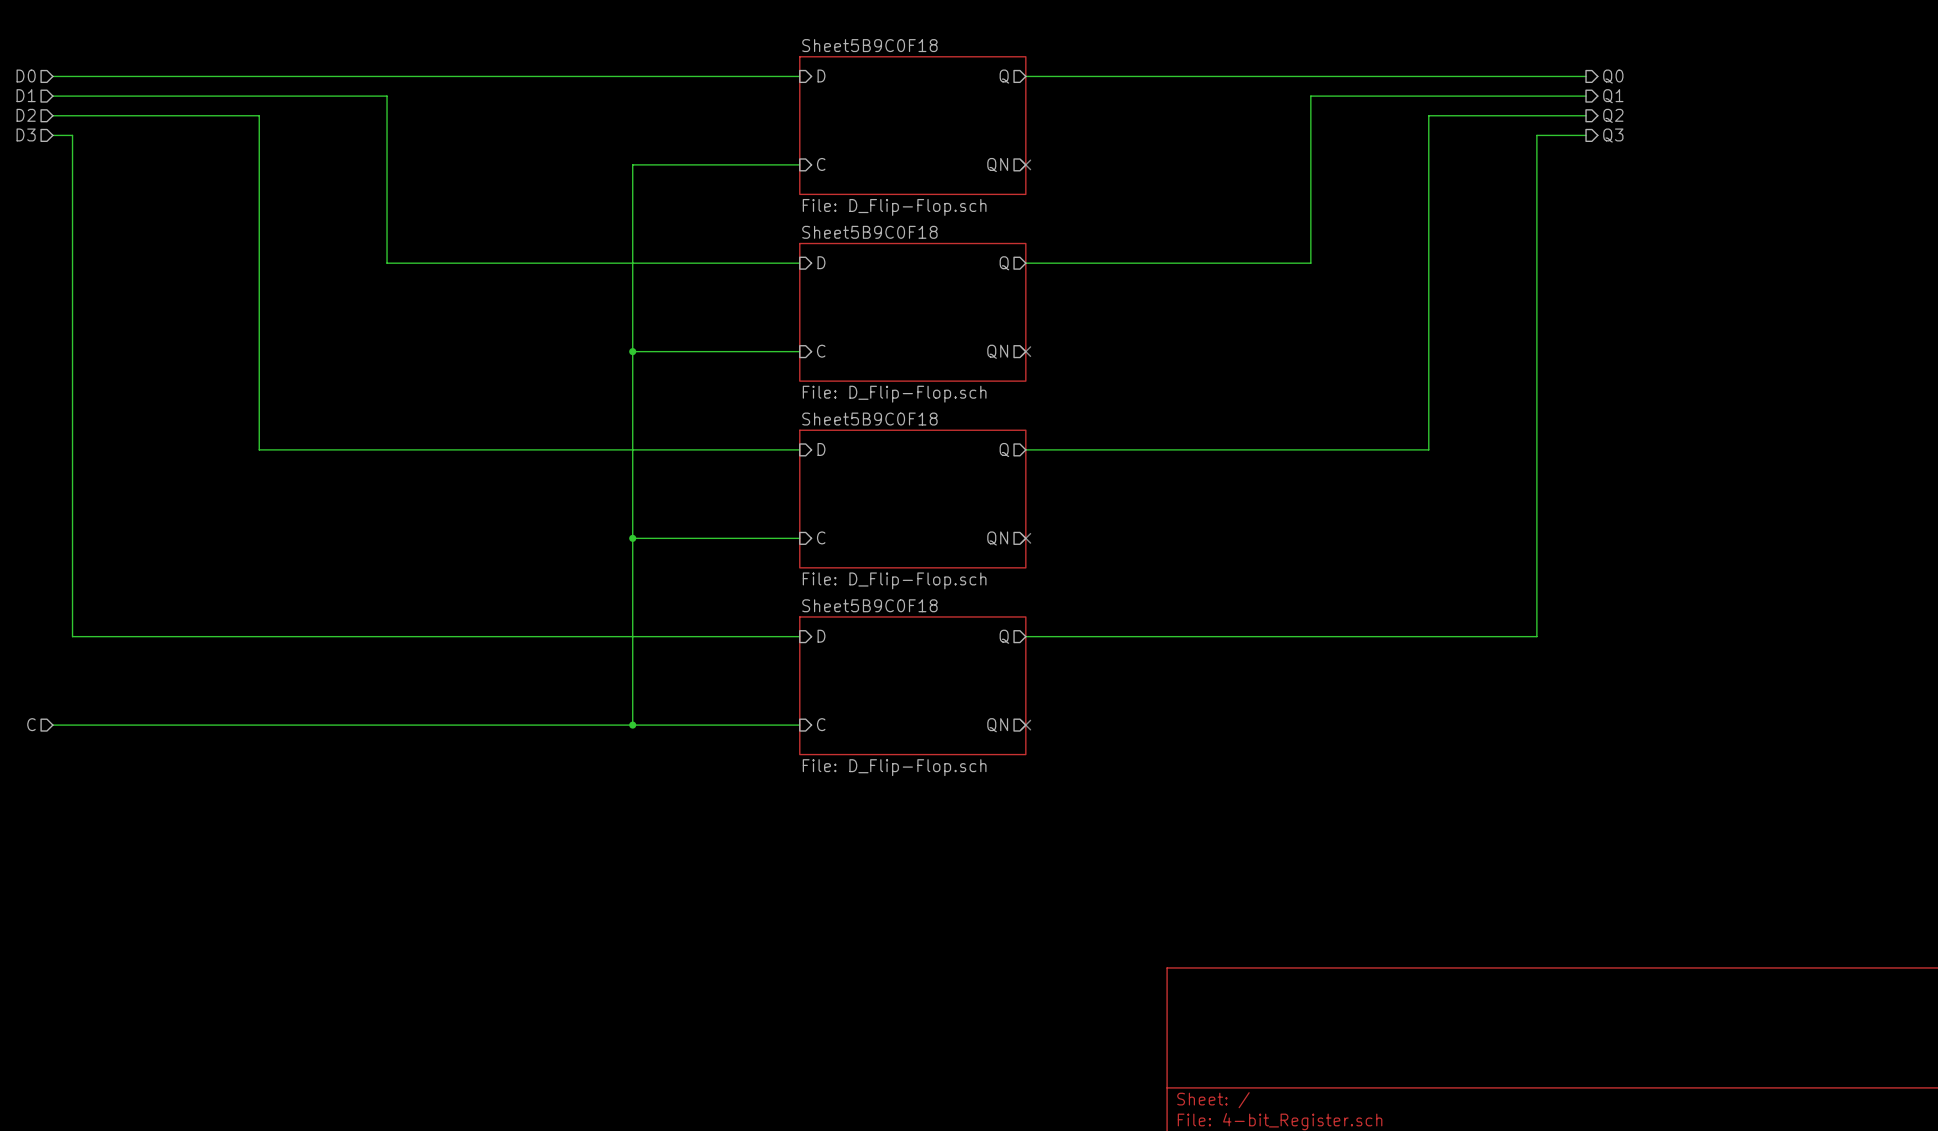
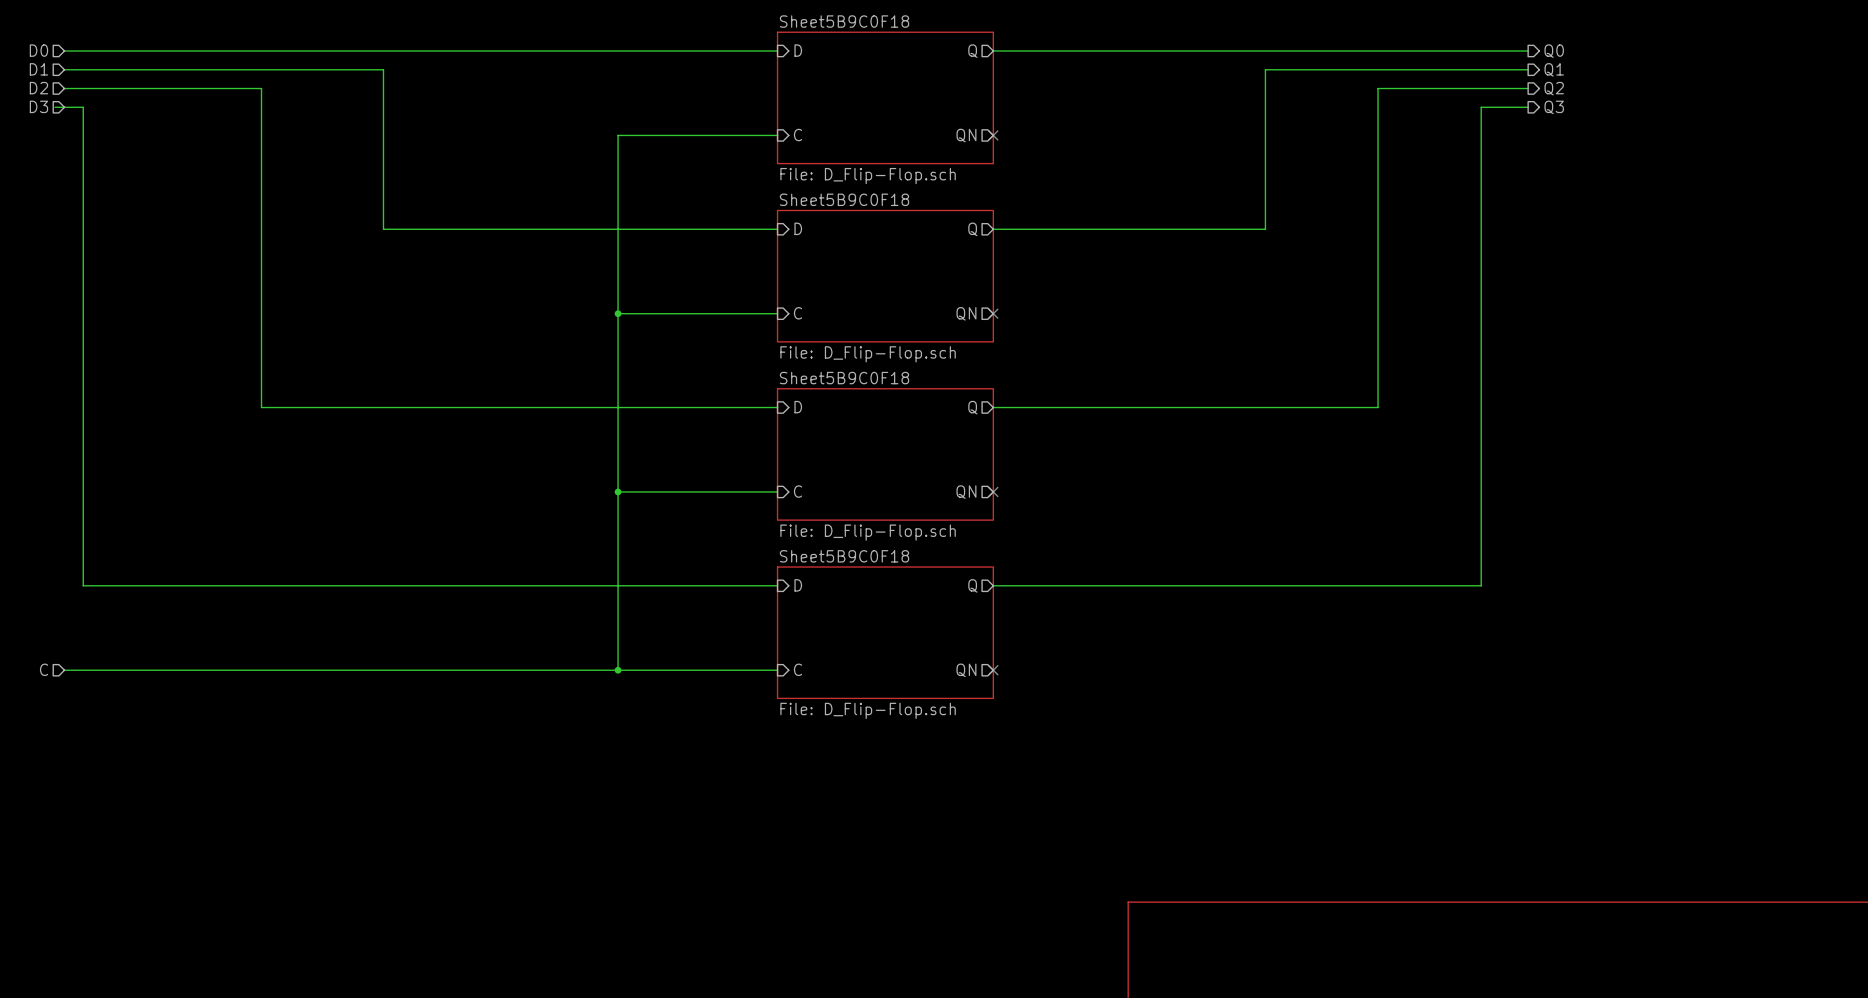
wire: none -> (55, 107) (64, 107)

